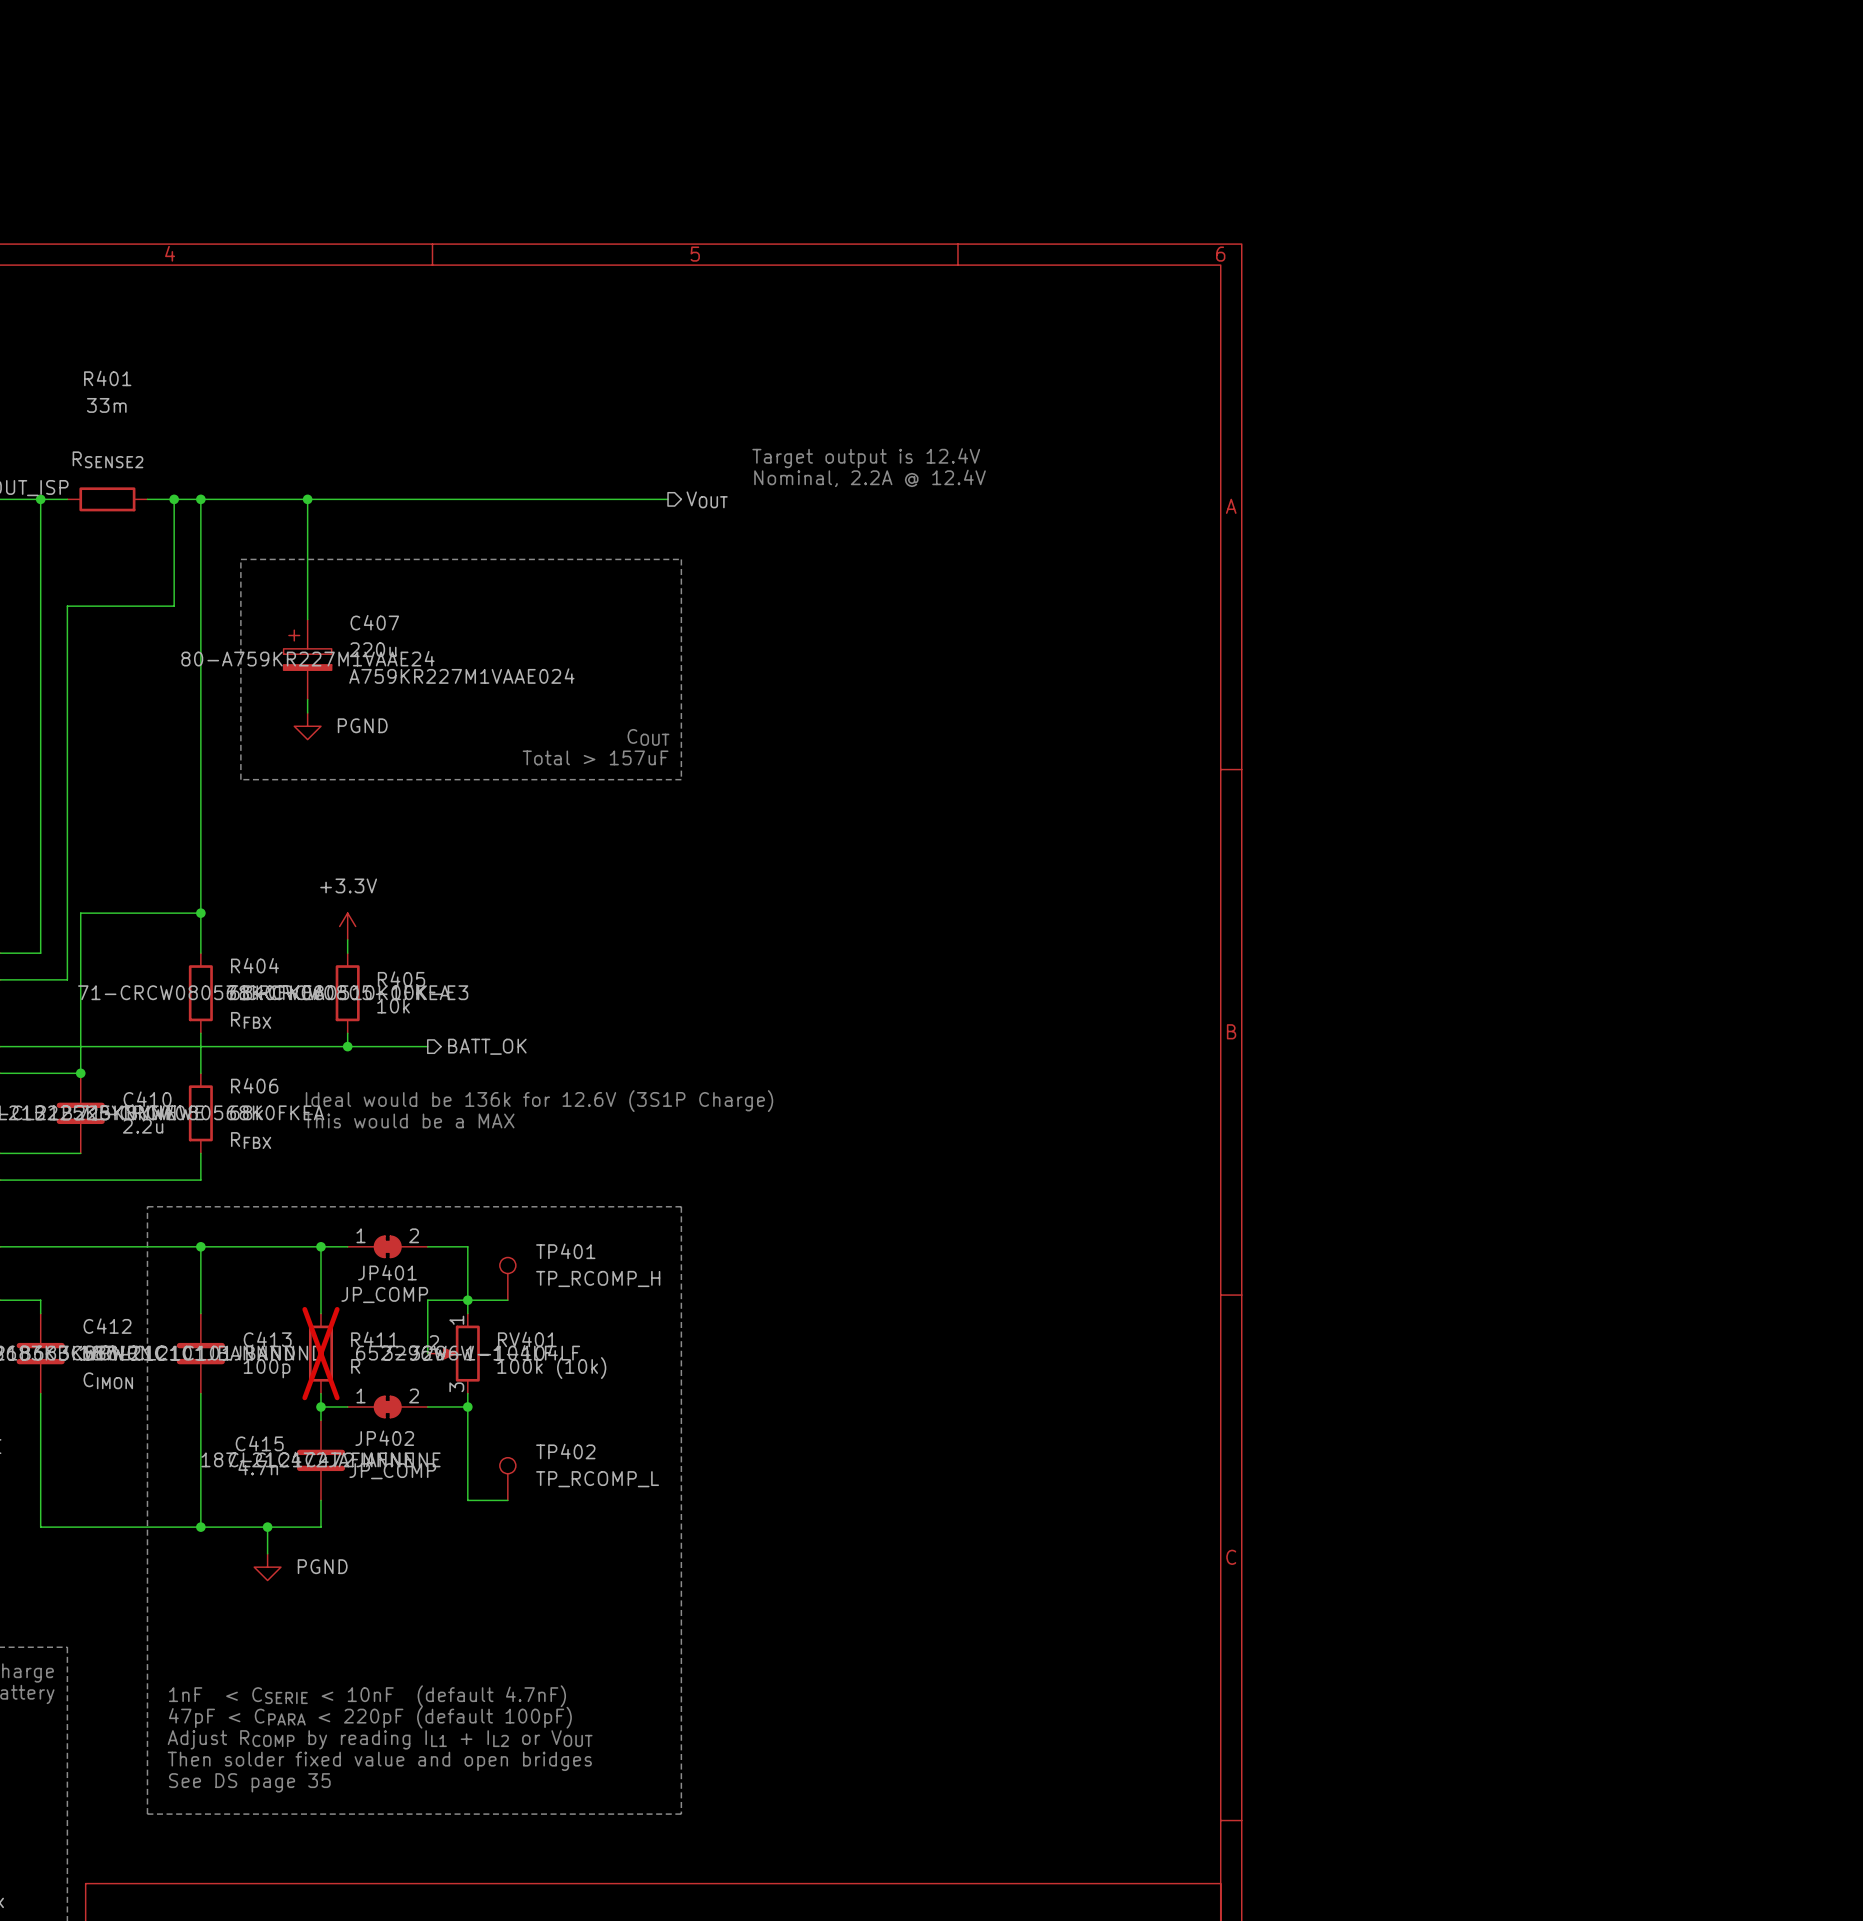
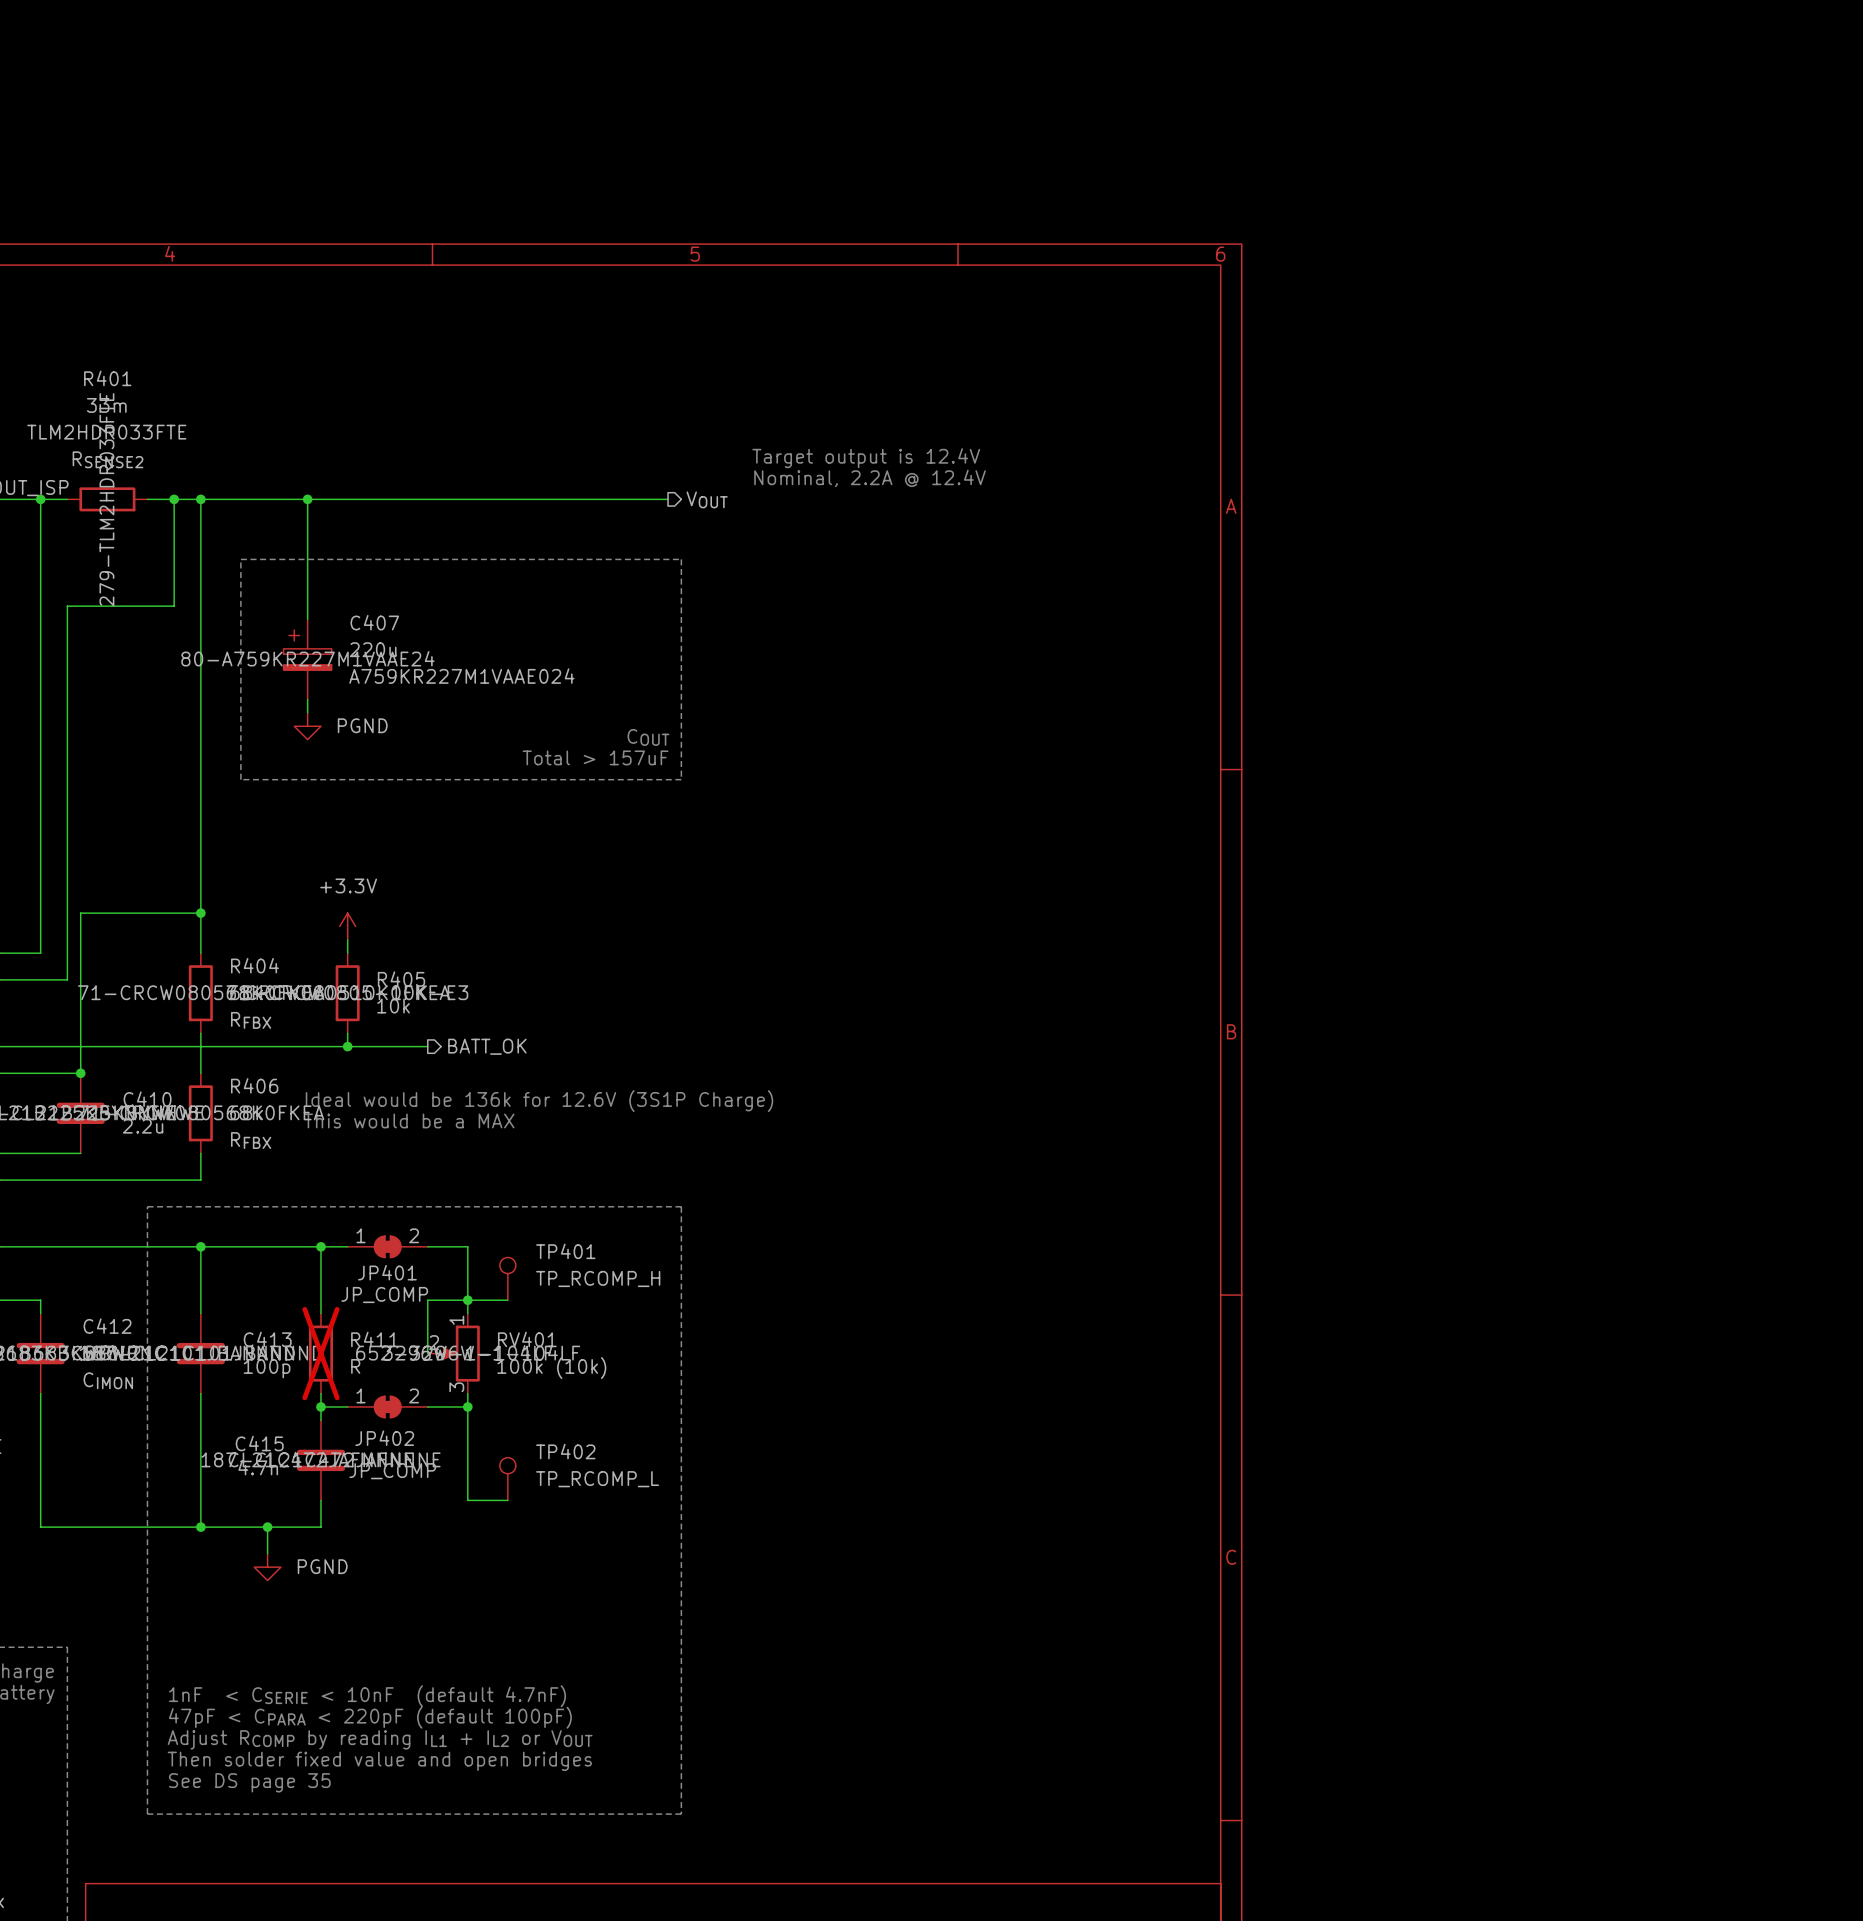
R401 text: none -> TLM2HDR033FTE (106, 432)
R401 text: none -> 279-TLM2HDR033FTE (106, 499)

